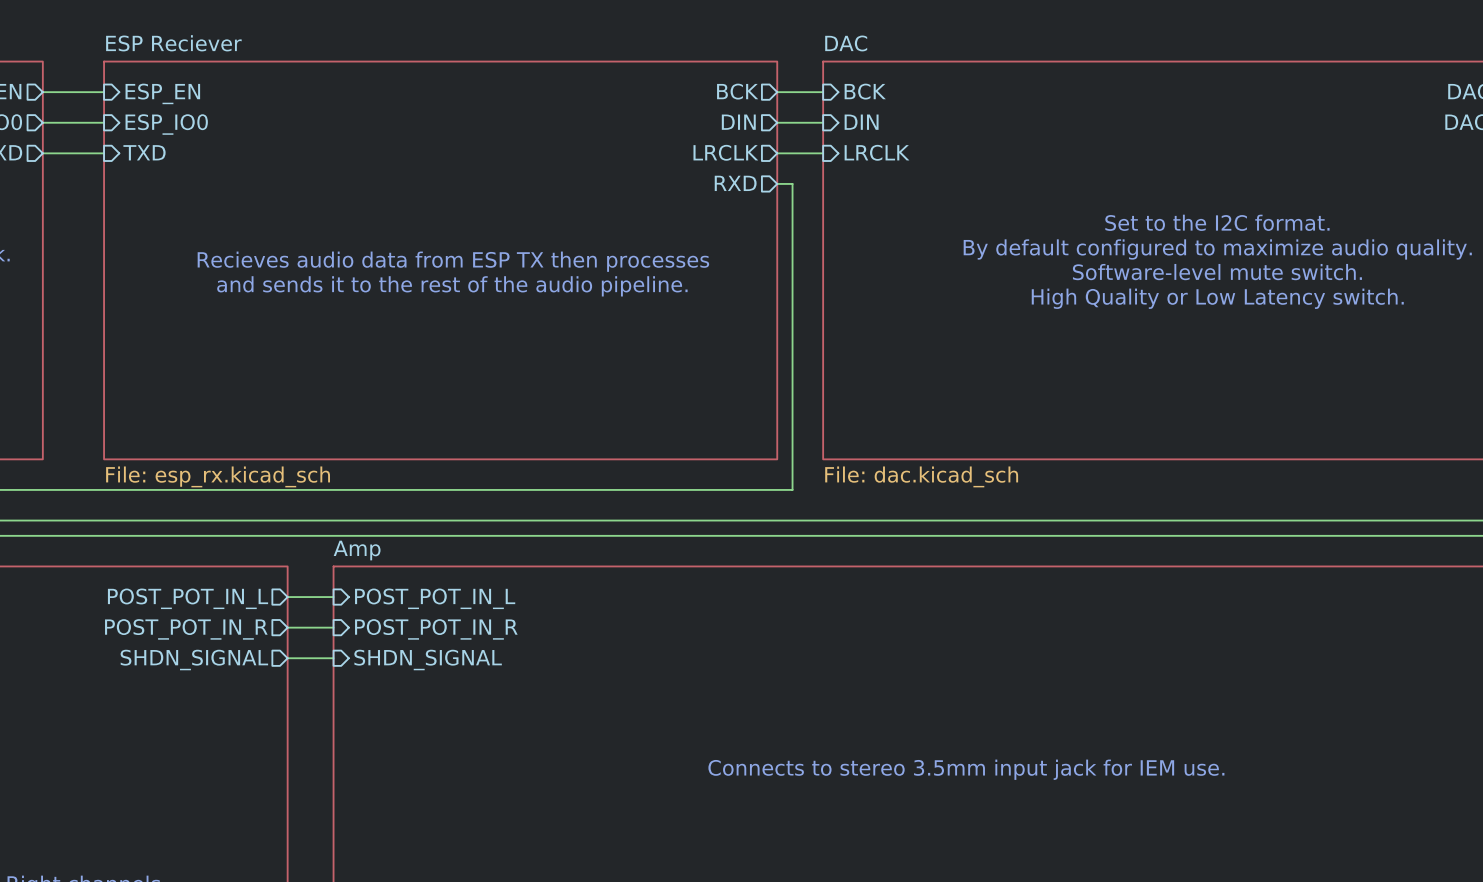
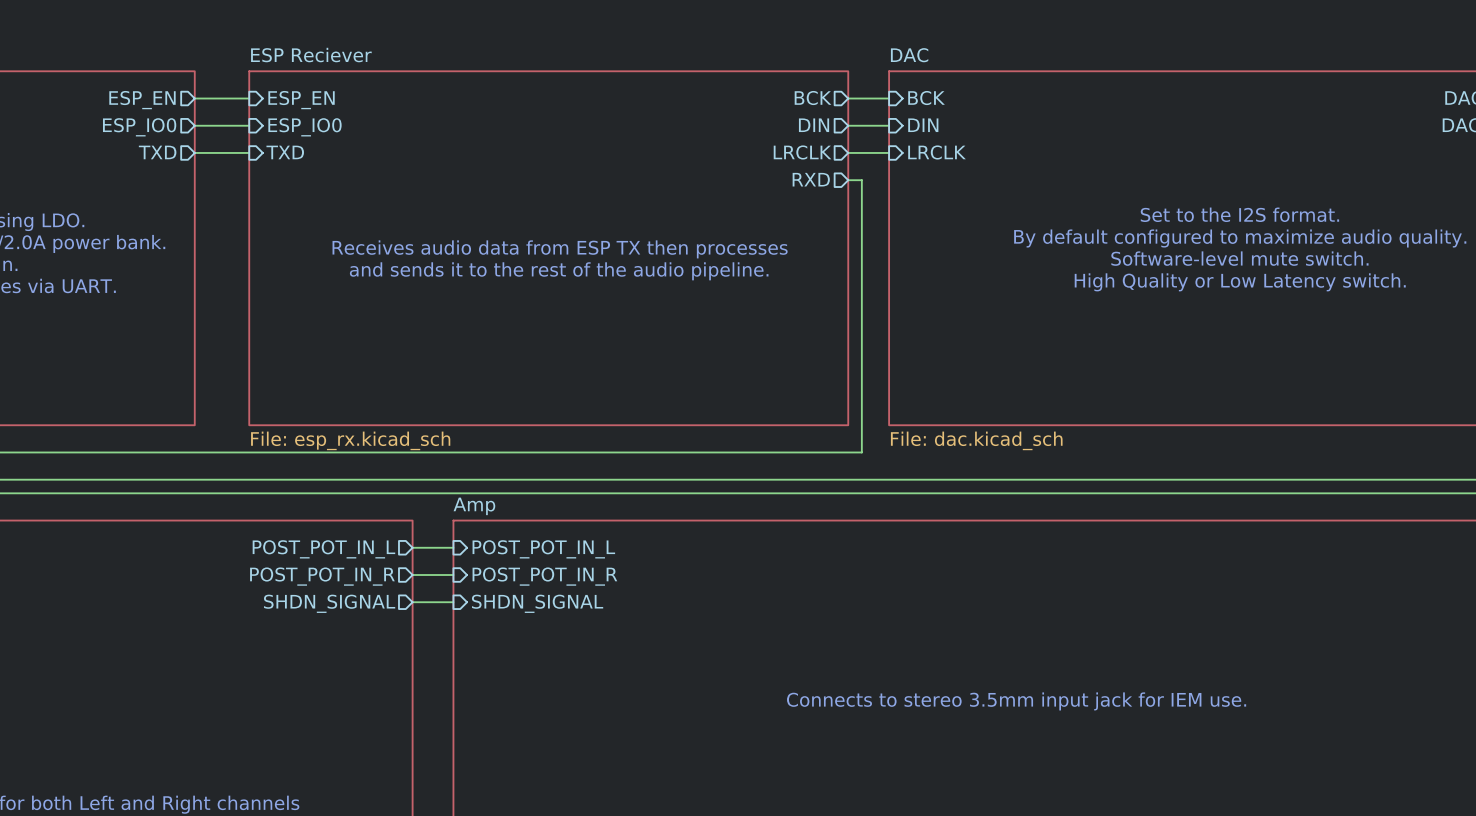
text: Set to the I2C format. (1217, 222) -> Set to the I2S format. (1239, 214)
text: Recieves audio data from ESP TX then processes (453, 261) -> Receives audio data from ESP TX then processes (560, 249)

